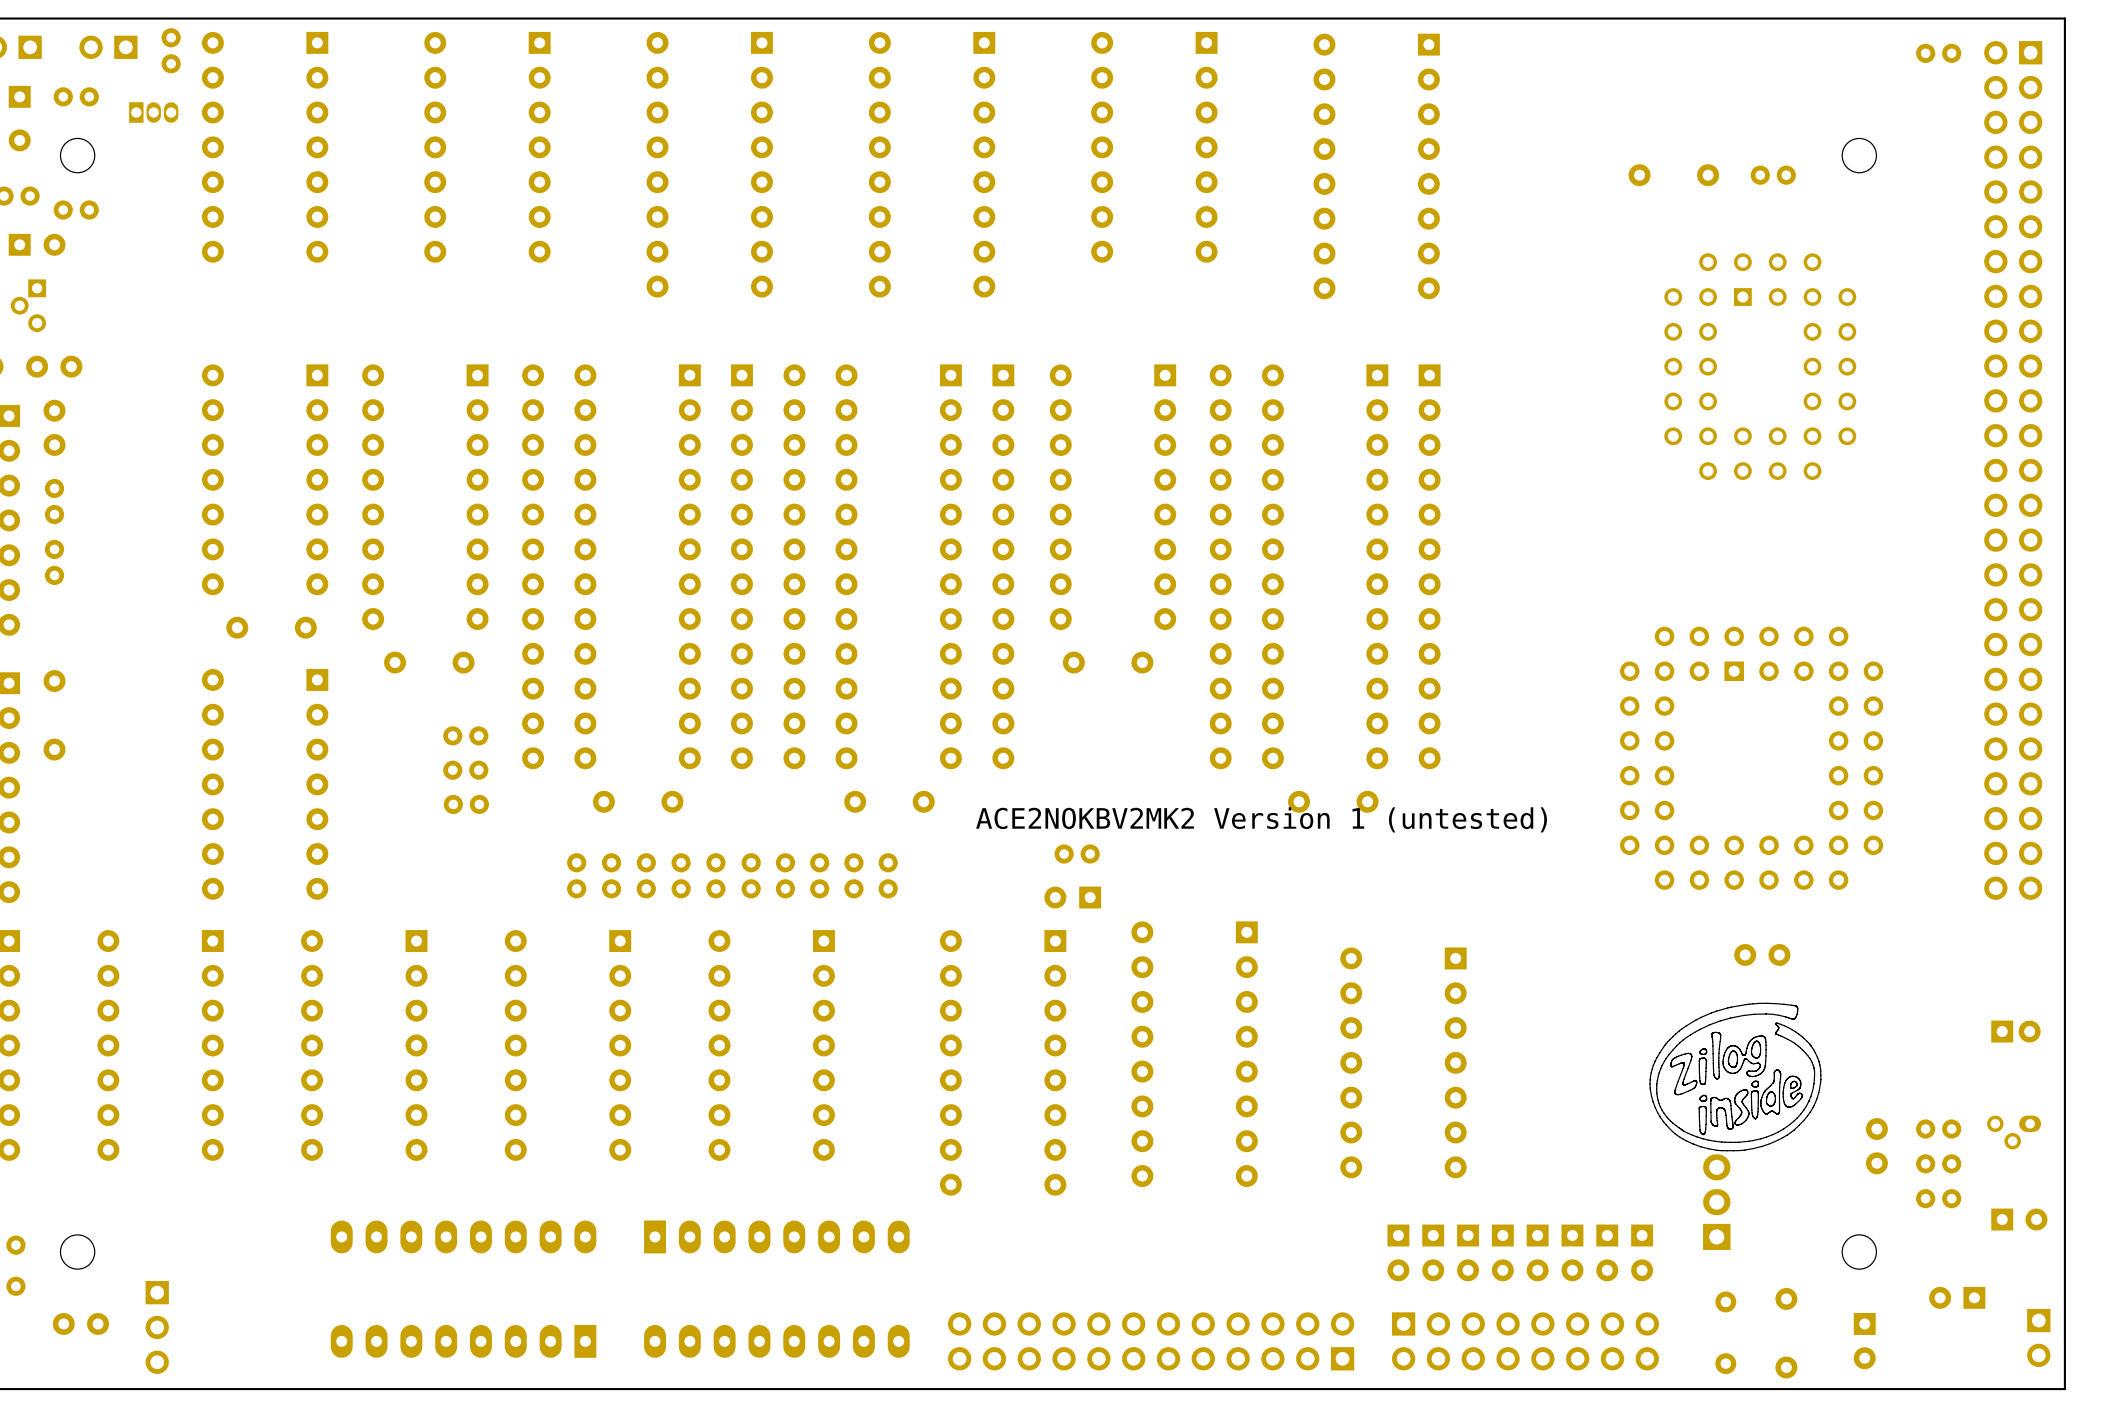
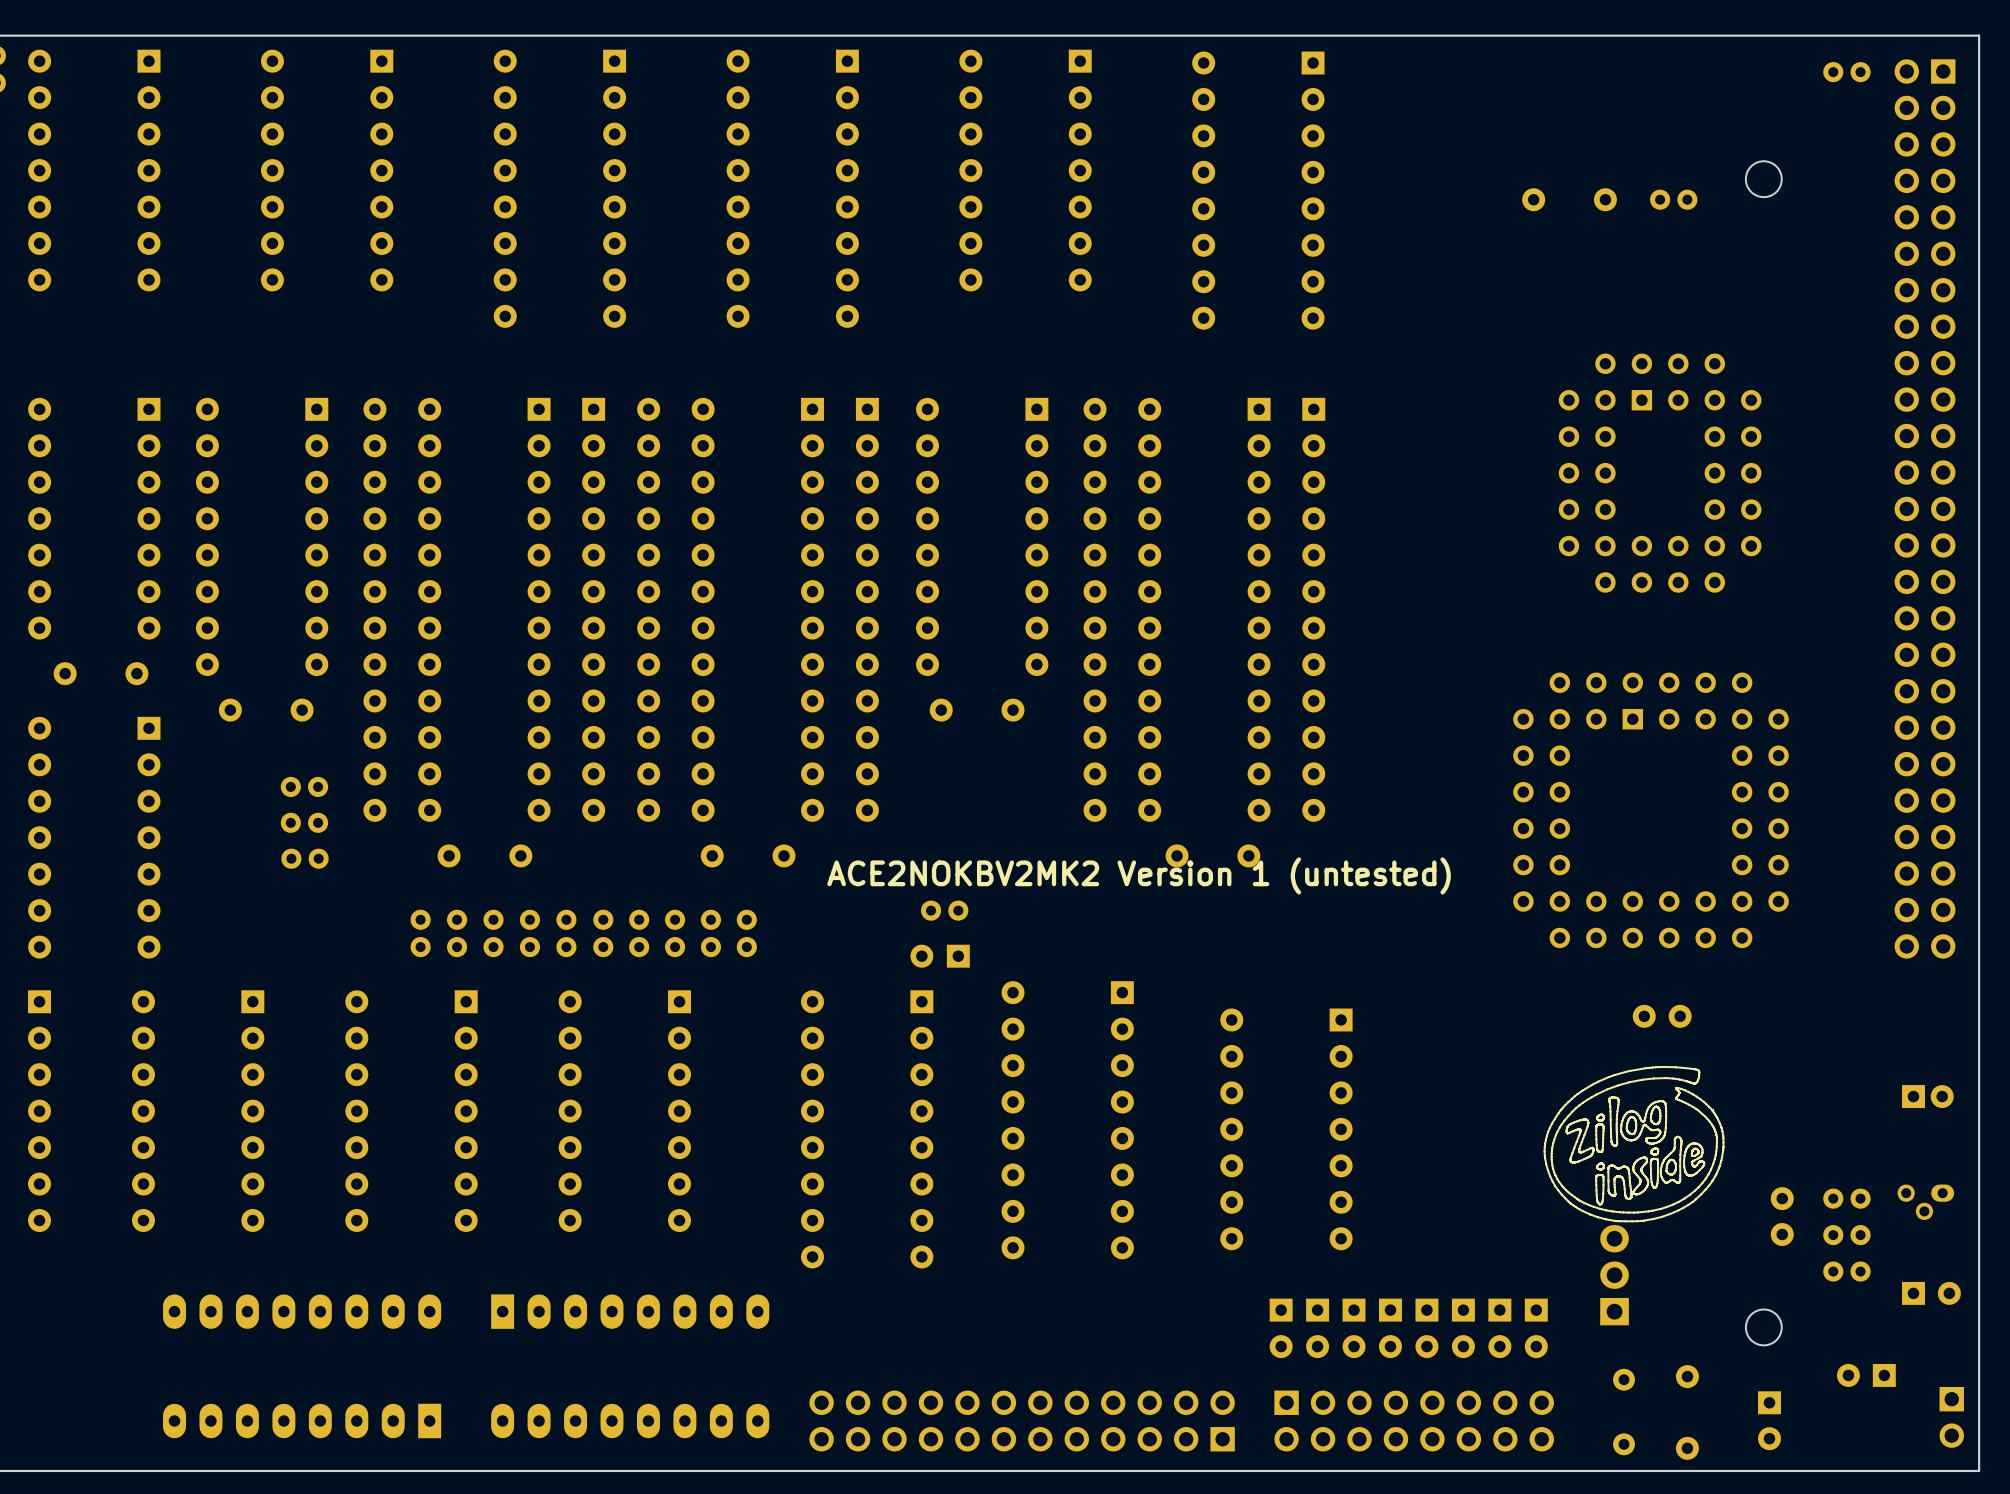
part: (1760, 366) -> none
part: none -> (1660, 473)

